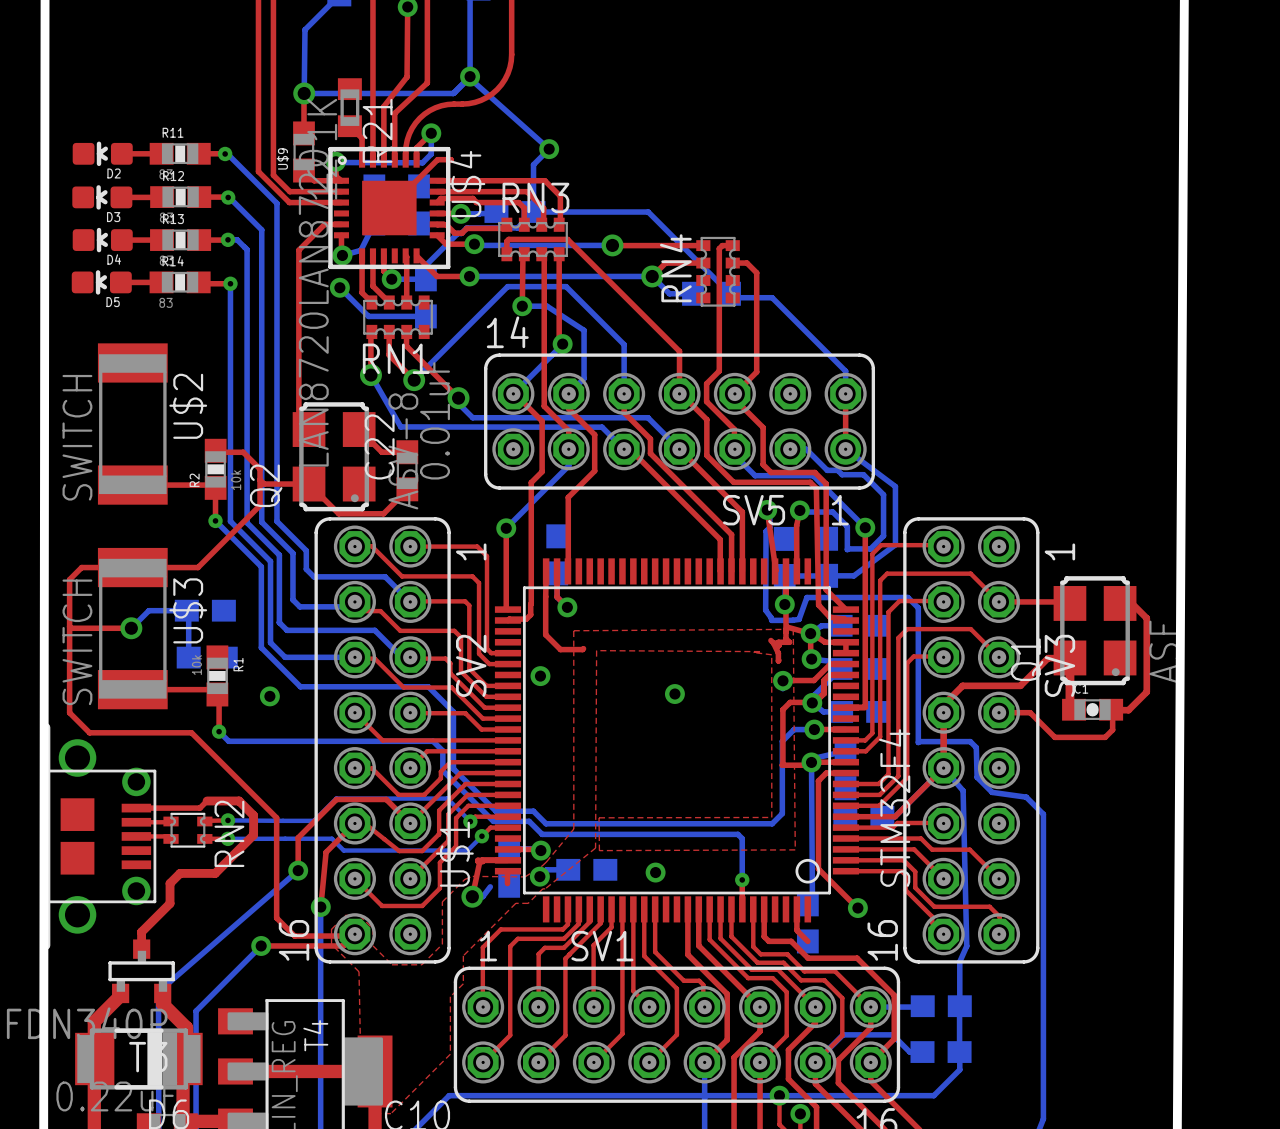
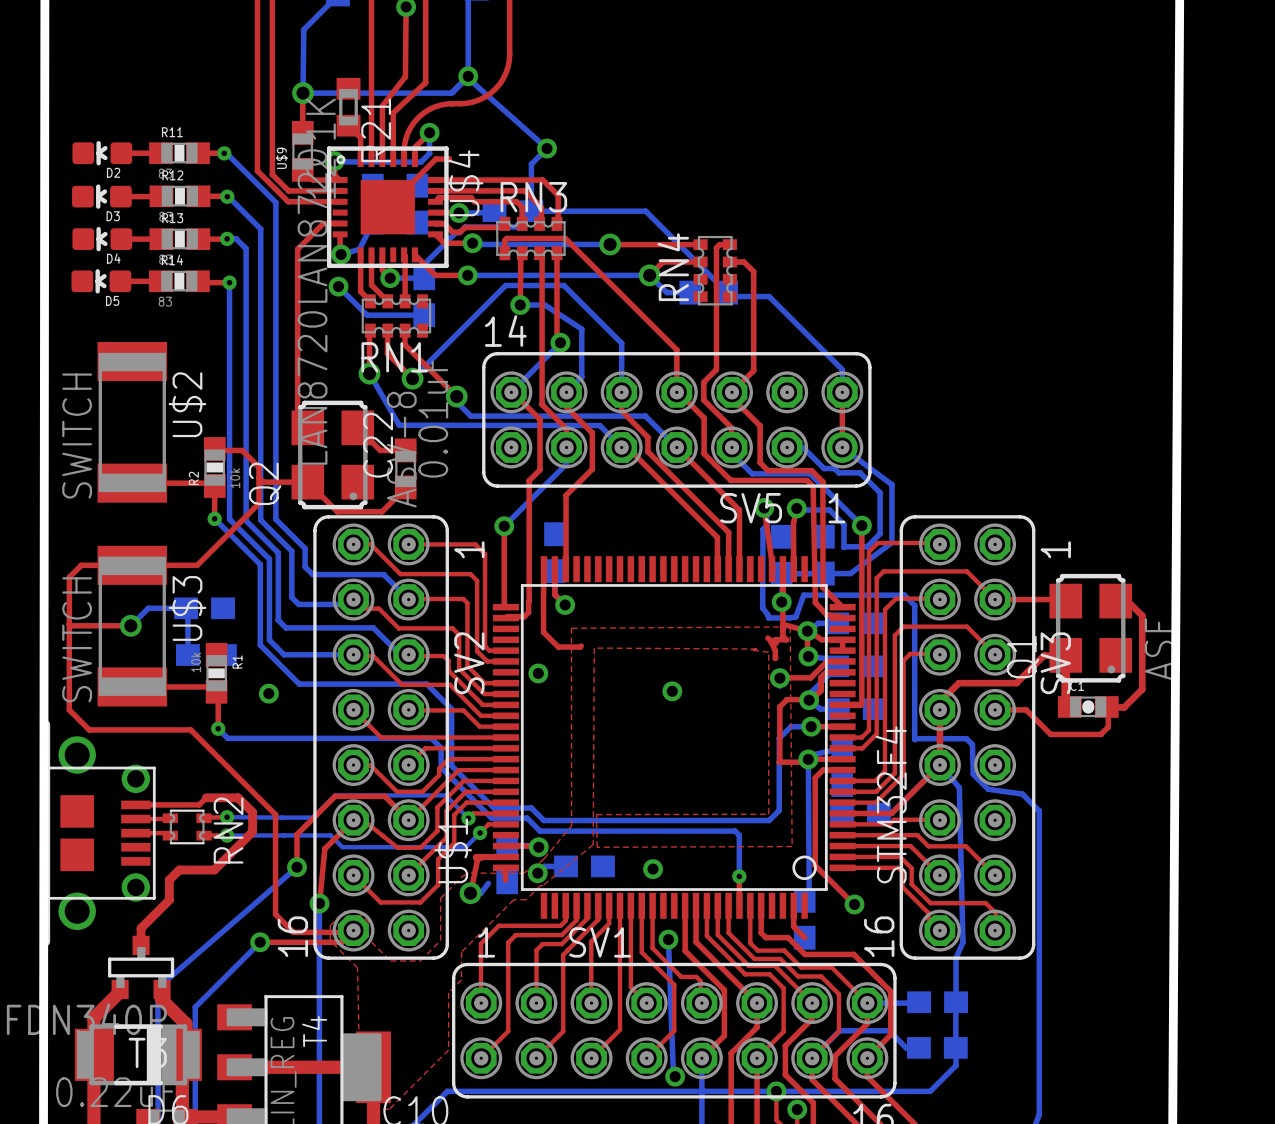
bottom track: none -> (668, 939) (673, 1075) (675, 1076)
via: none -> (668, 939)
via: none -> (675, 1076)

